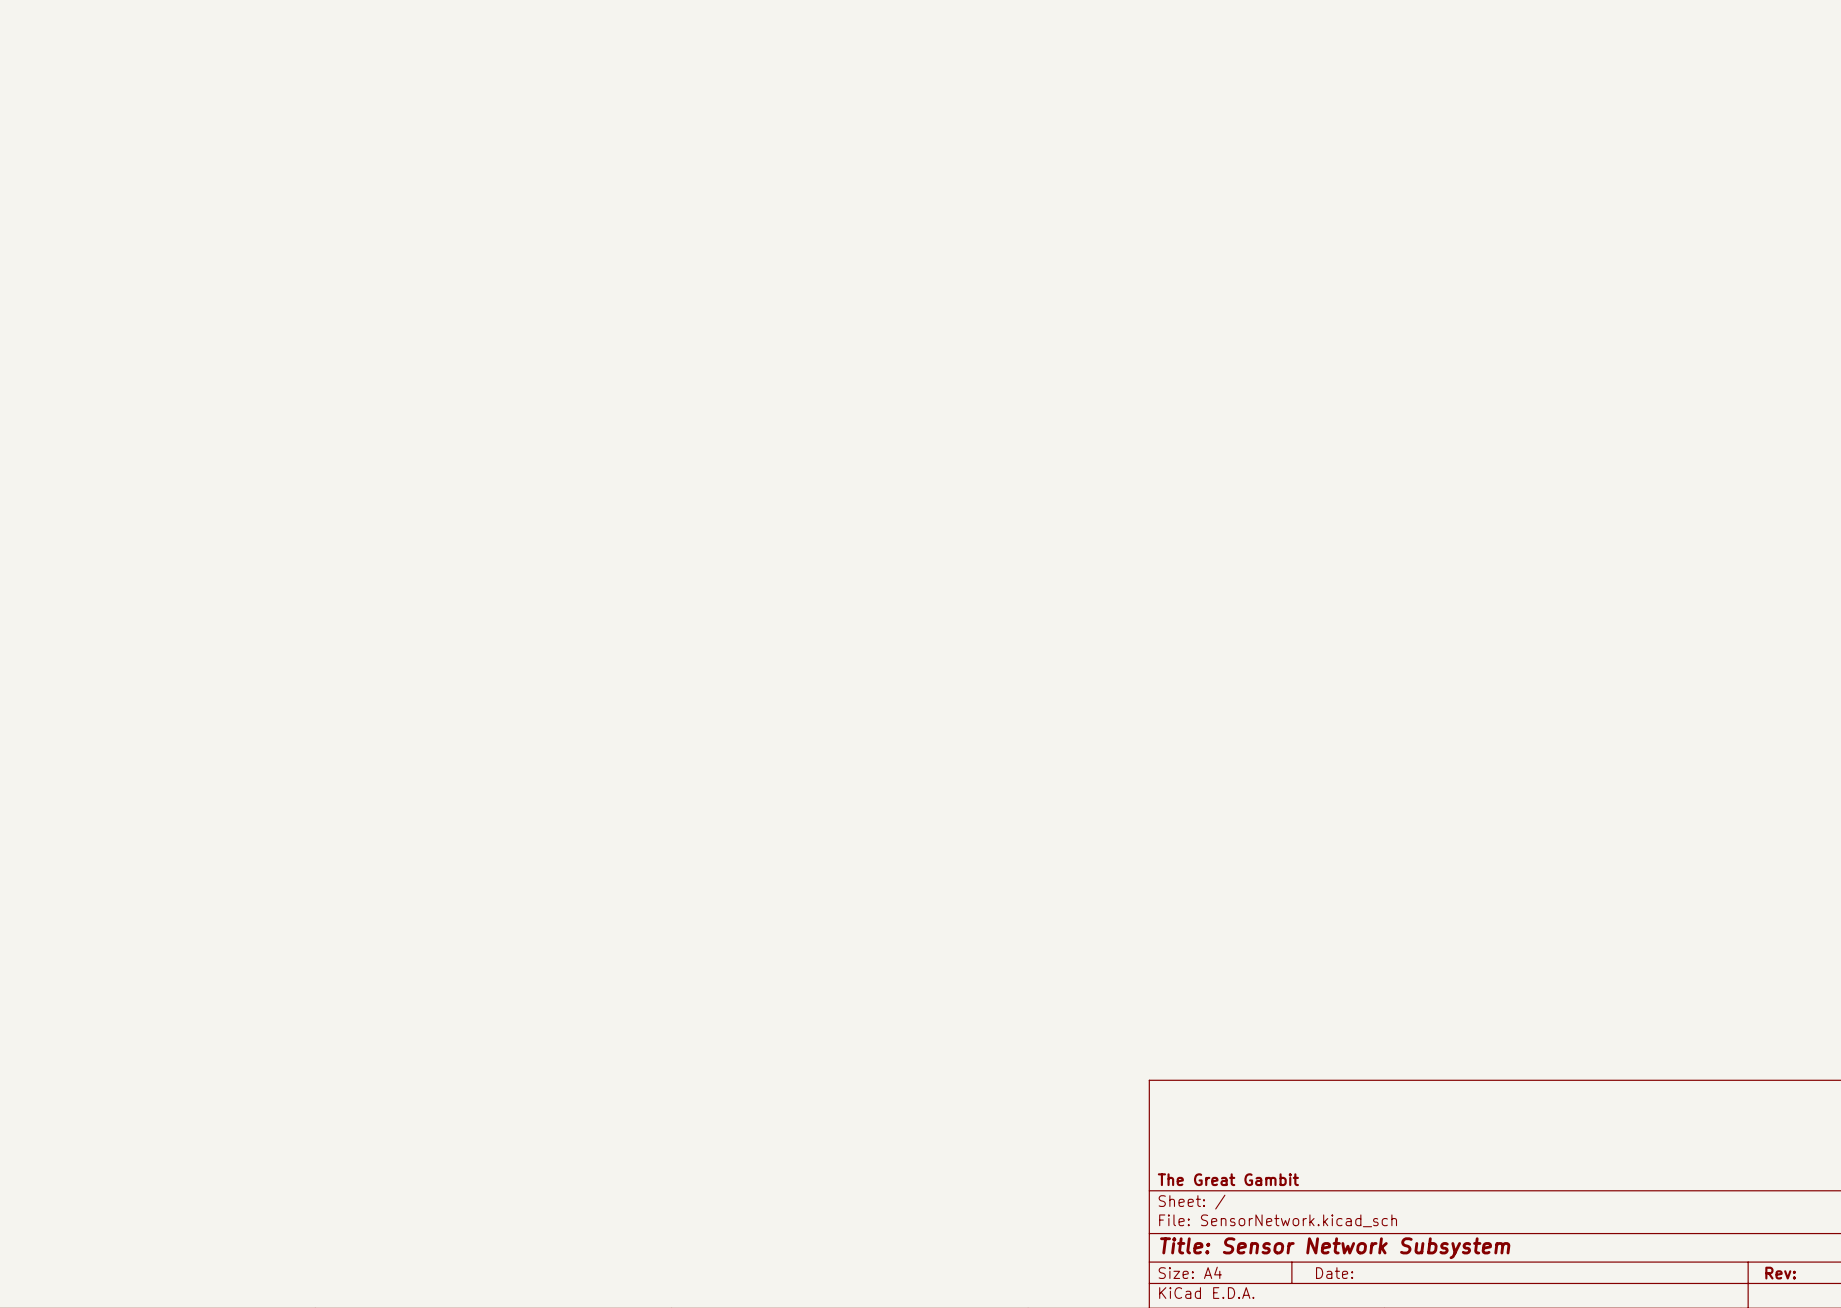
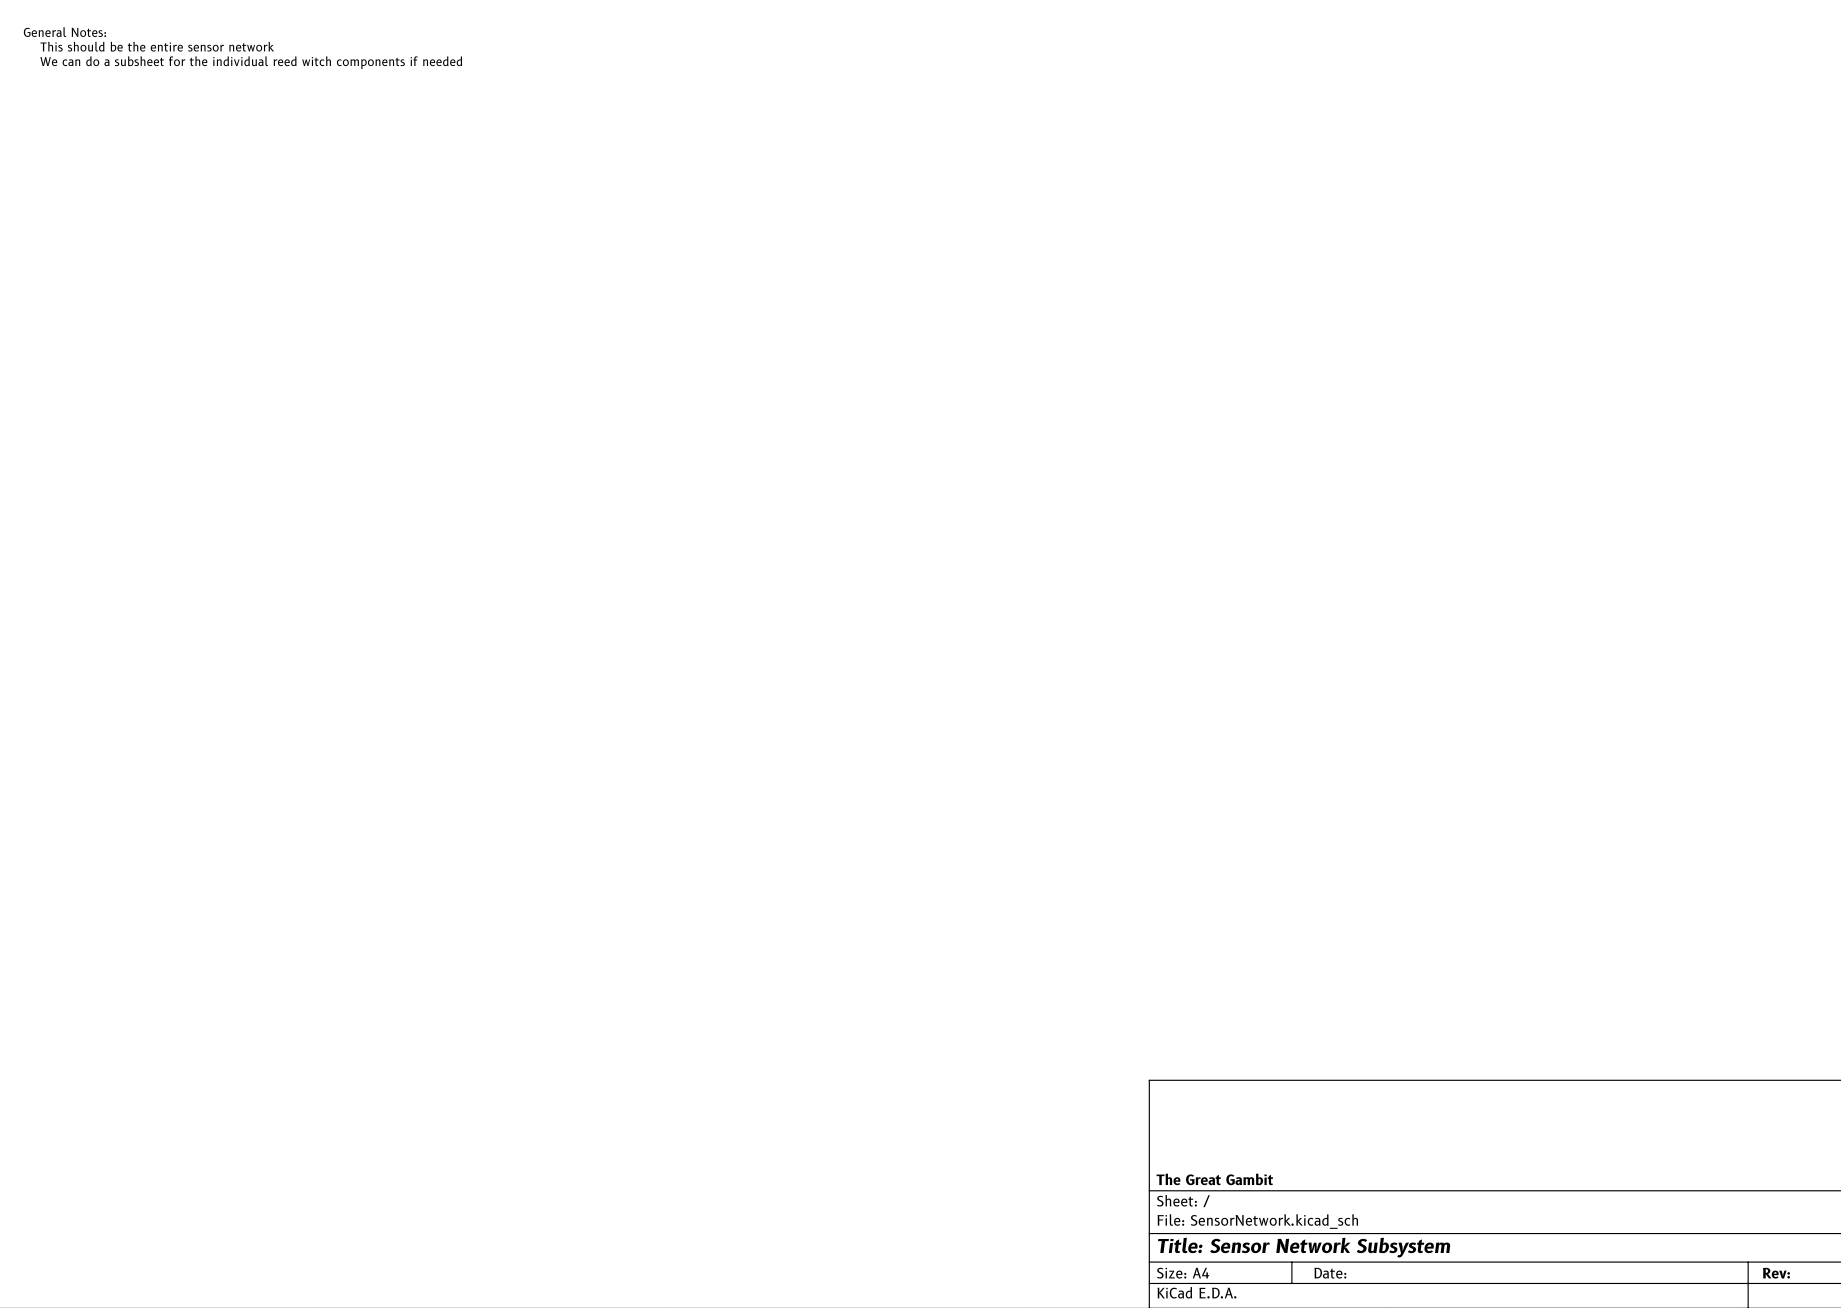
text: none -> General Notes: (64, 32)
text: none -> This should be the entire sensor network (157, 46)
text: none -> We can do a subsheet for the individual reed witch components if needed (251, 62)

